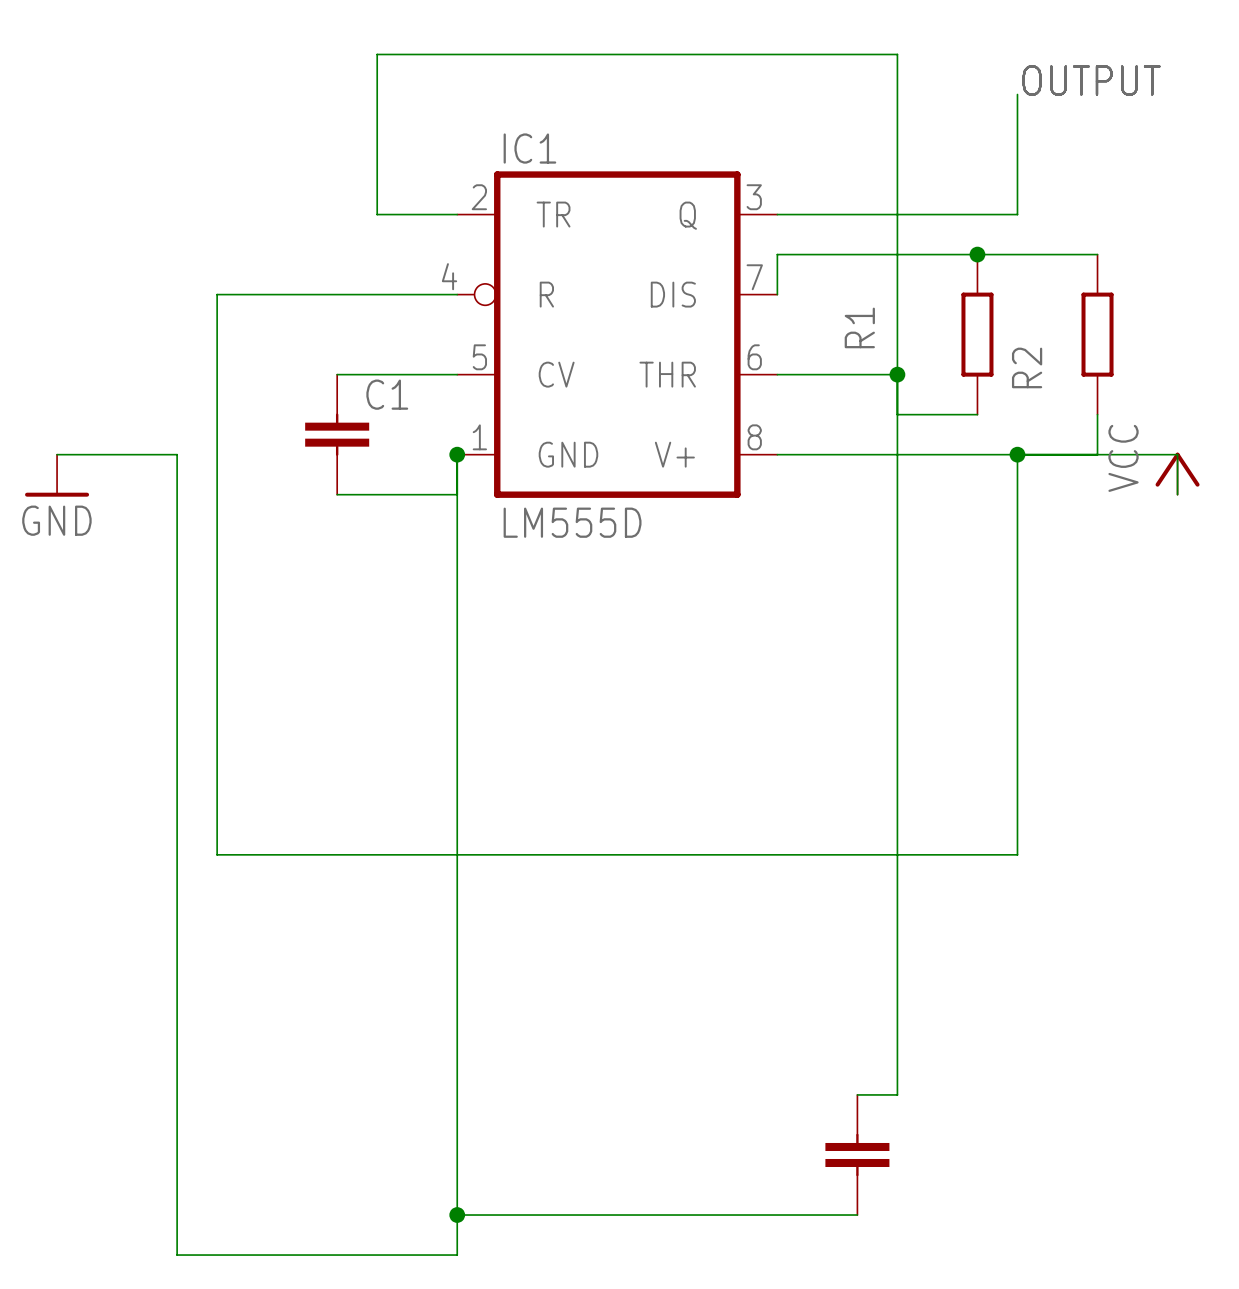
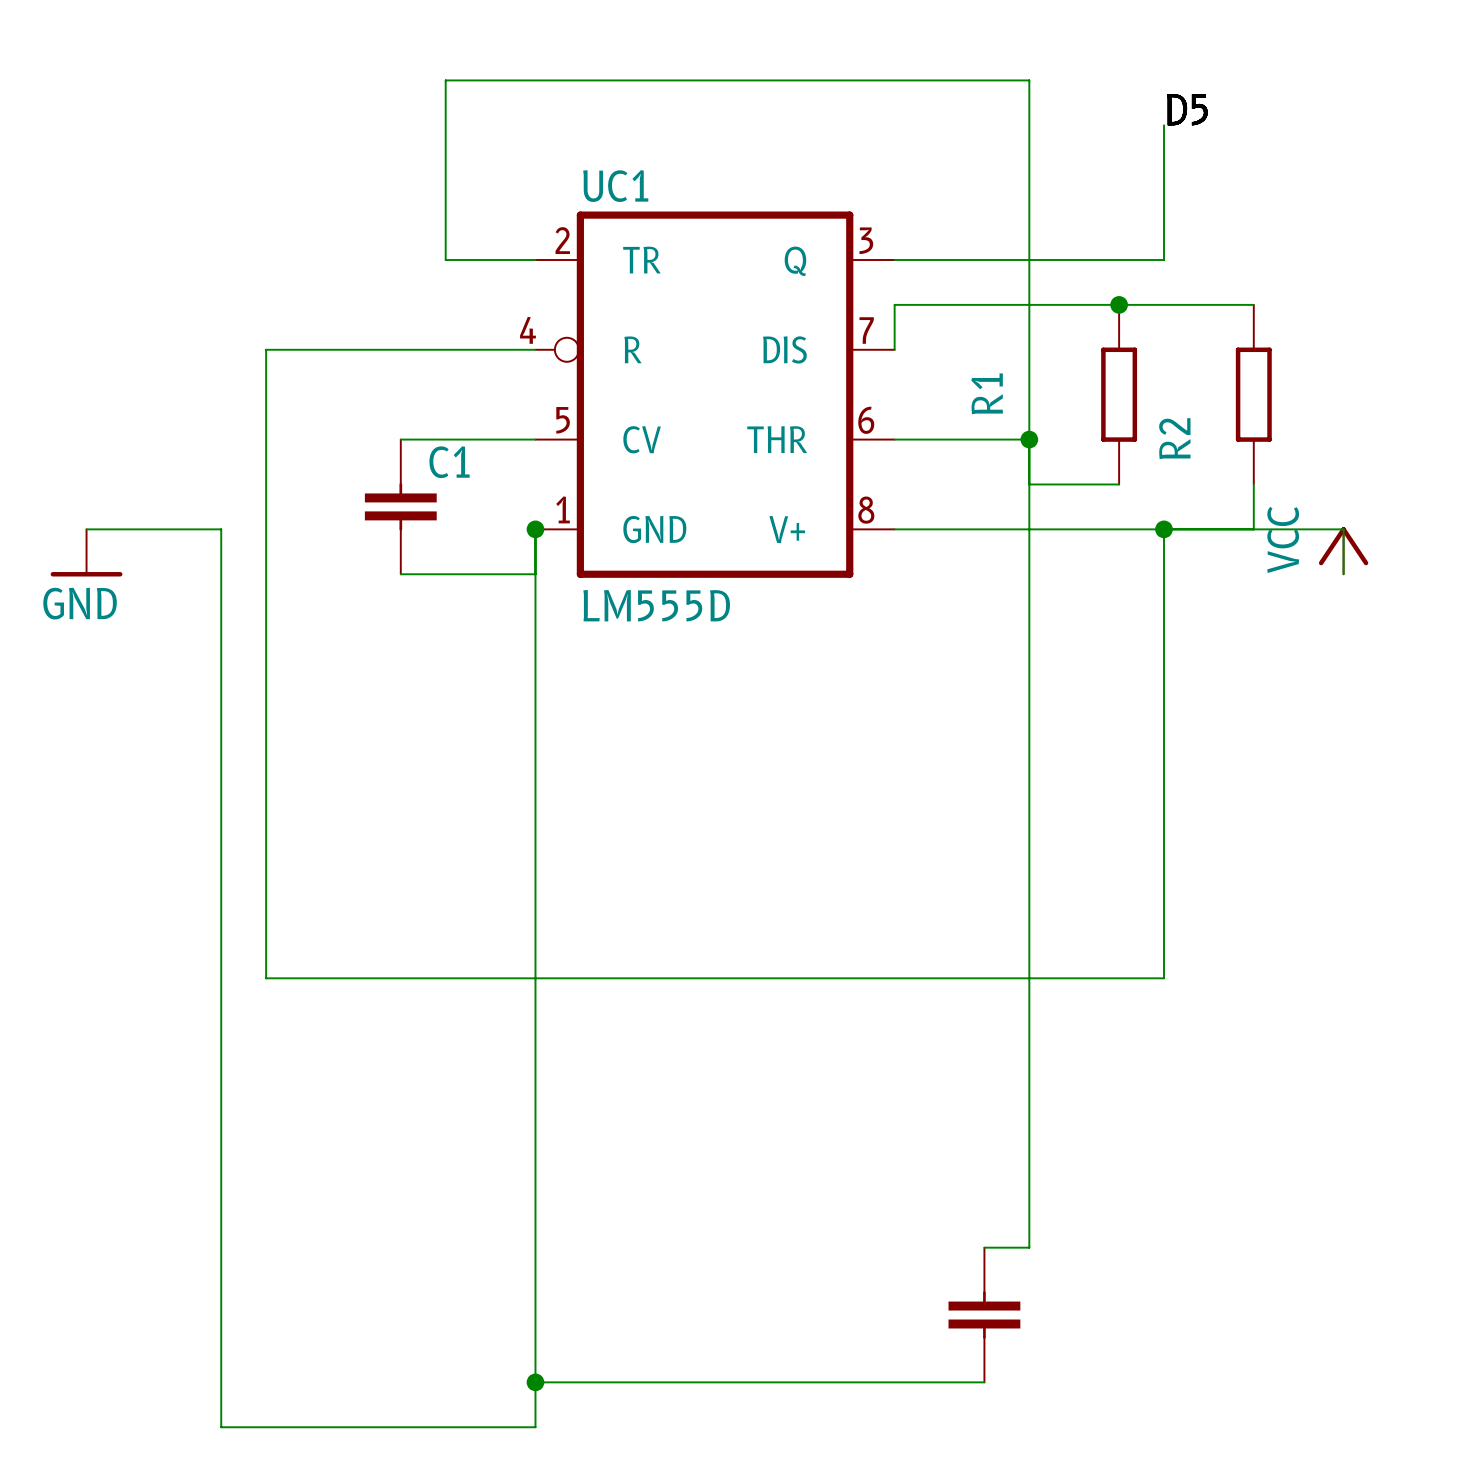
label: OUTPUT (1091, 80) -> D5 (1187, 109)
IC1 name: IC1 (529, 148) -> UC1 (615, 186)

